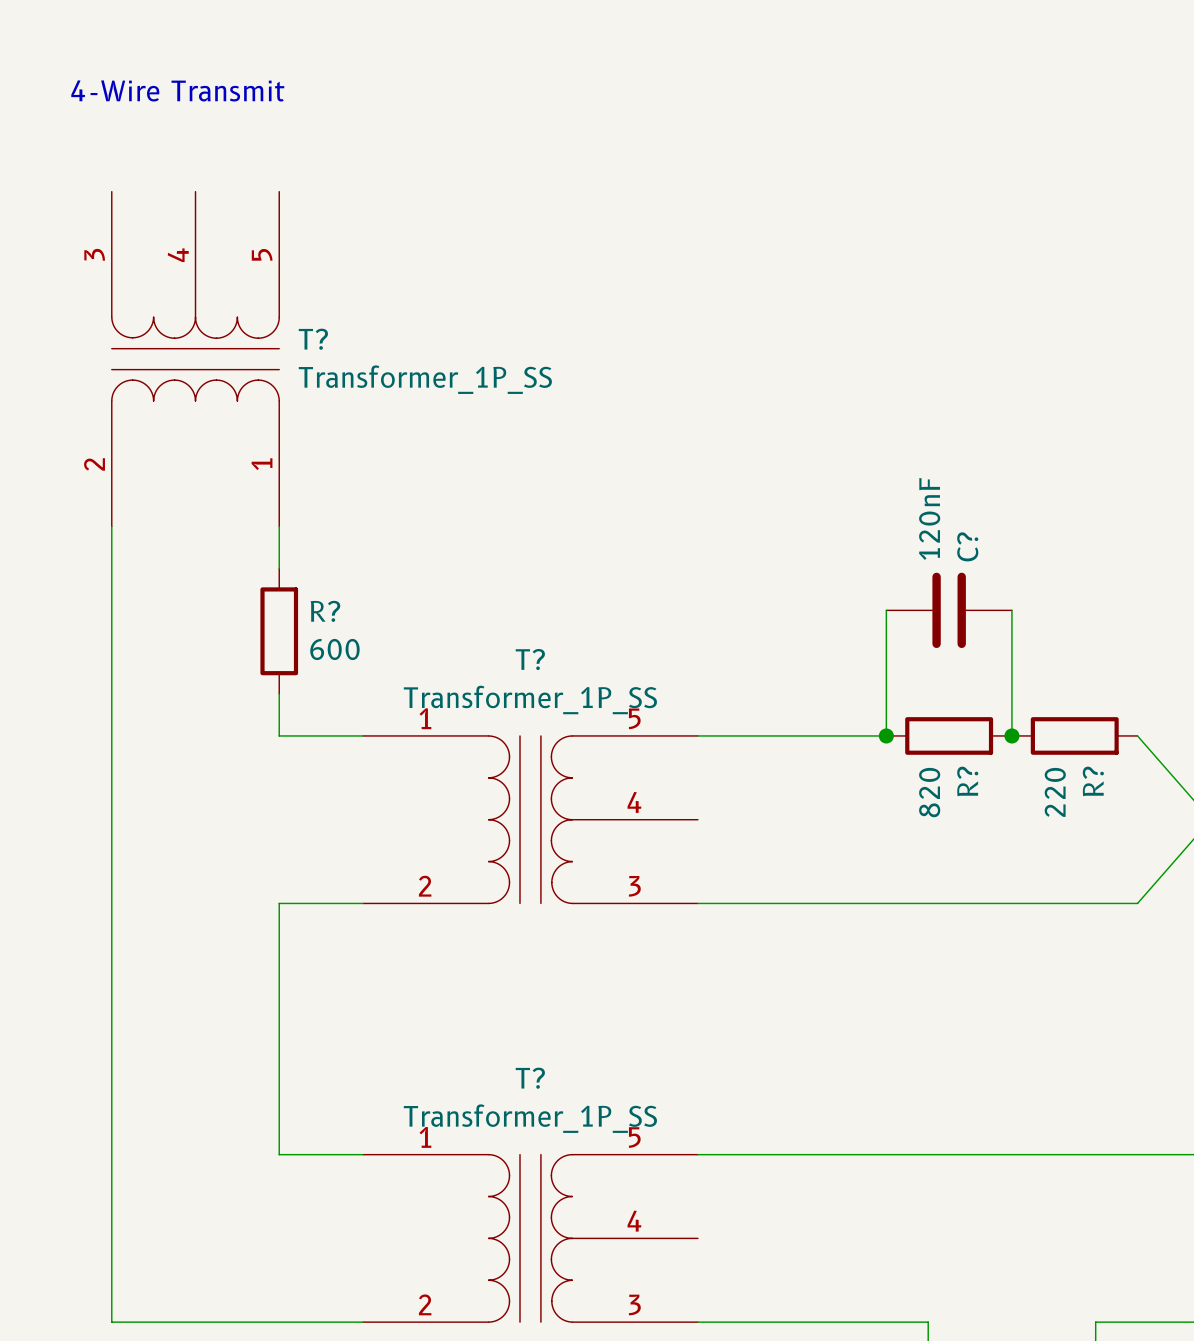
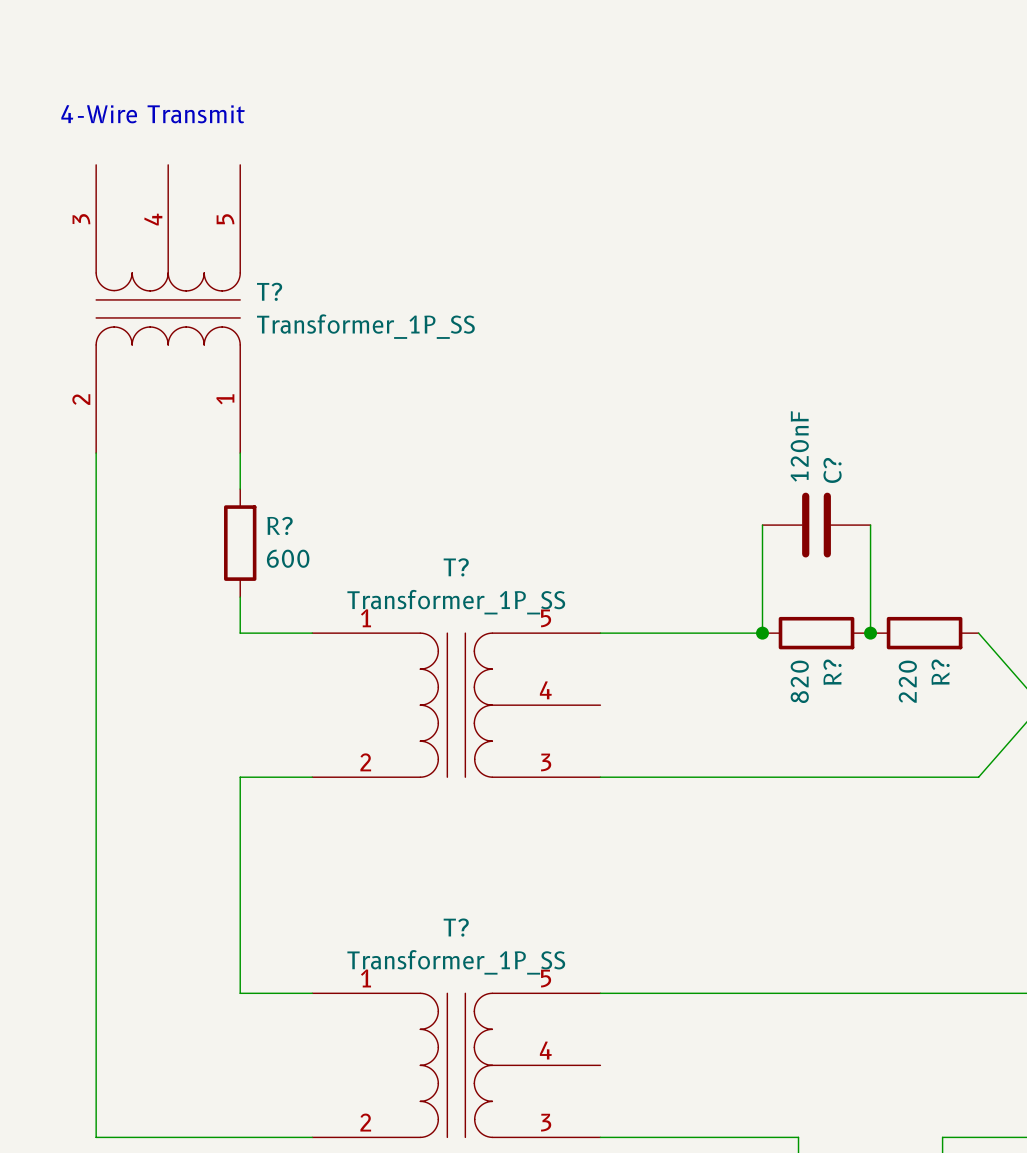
text position: 4-Wire Transmit (177, 90) -> 4-Wire Transmit (152, 114)

